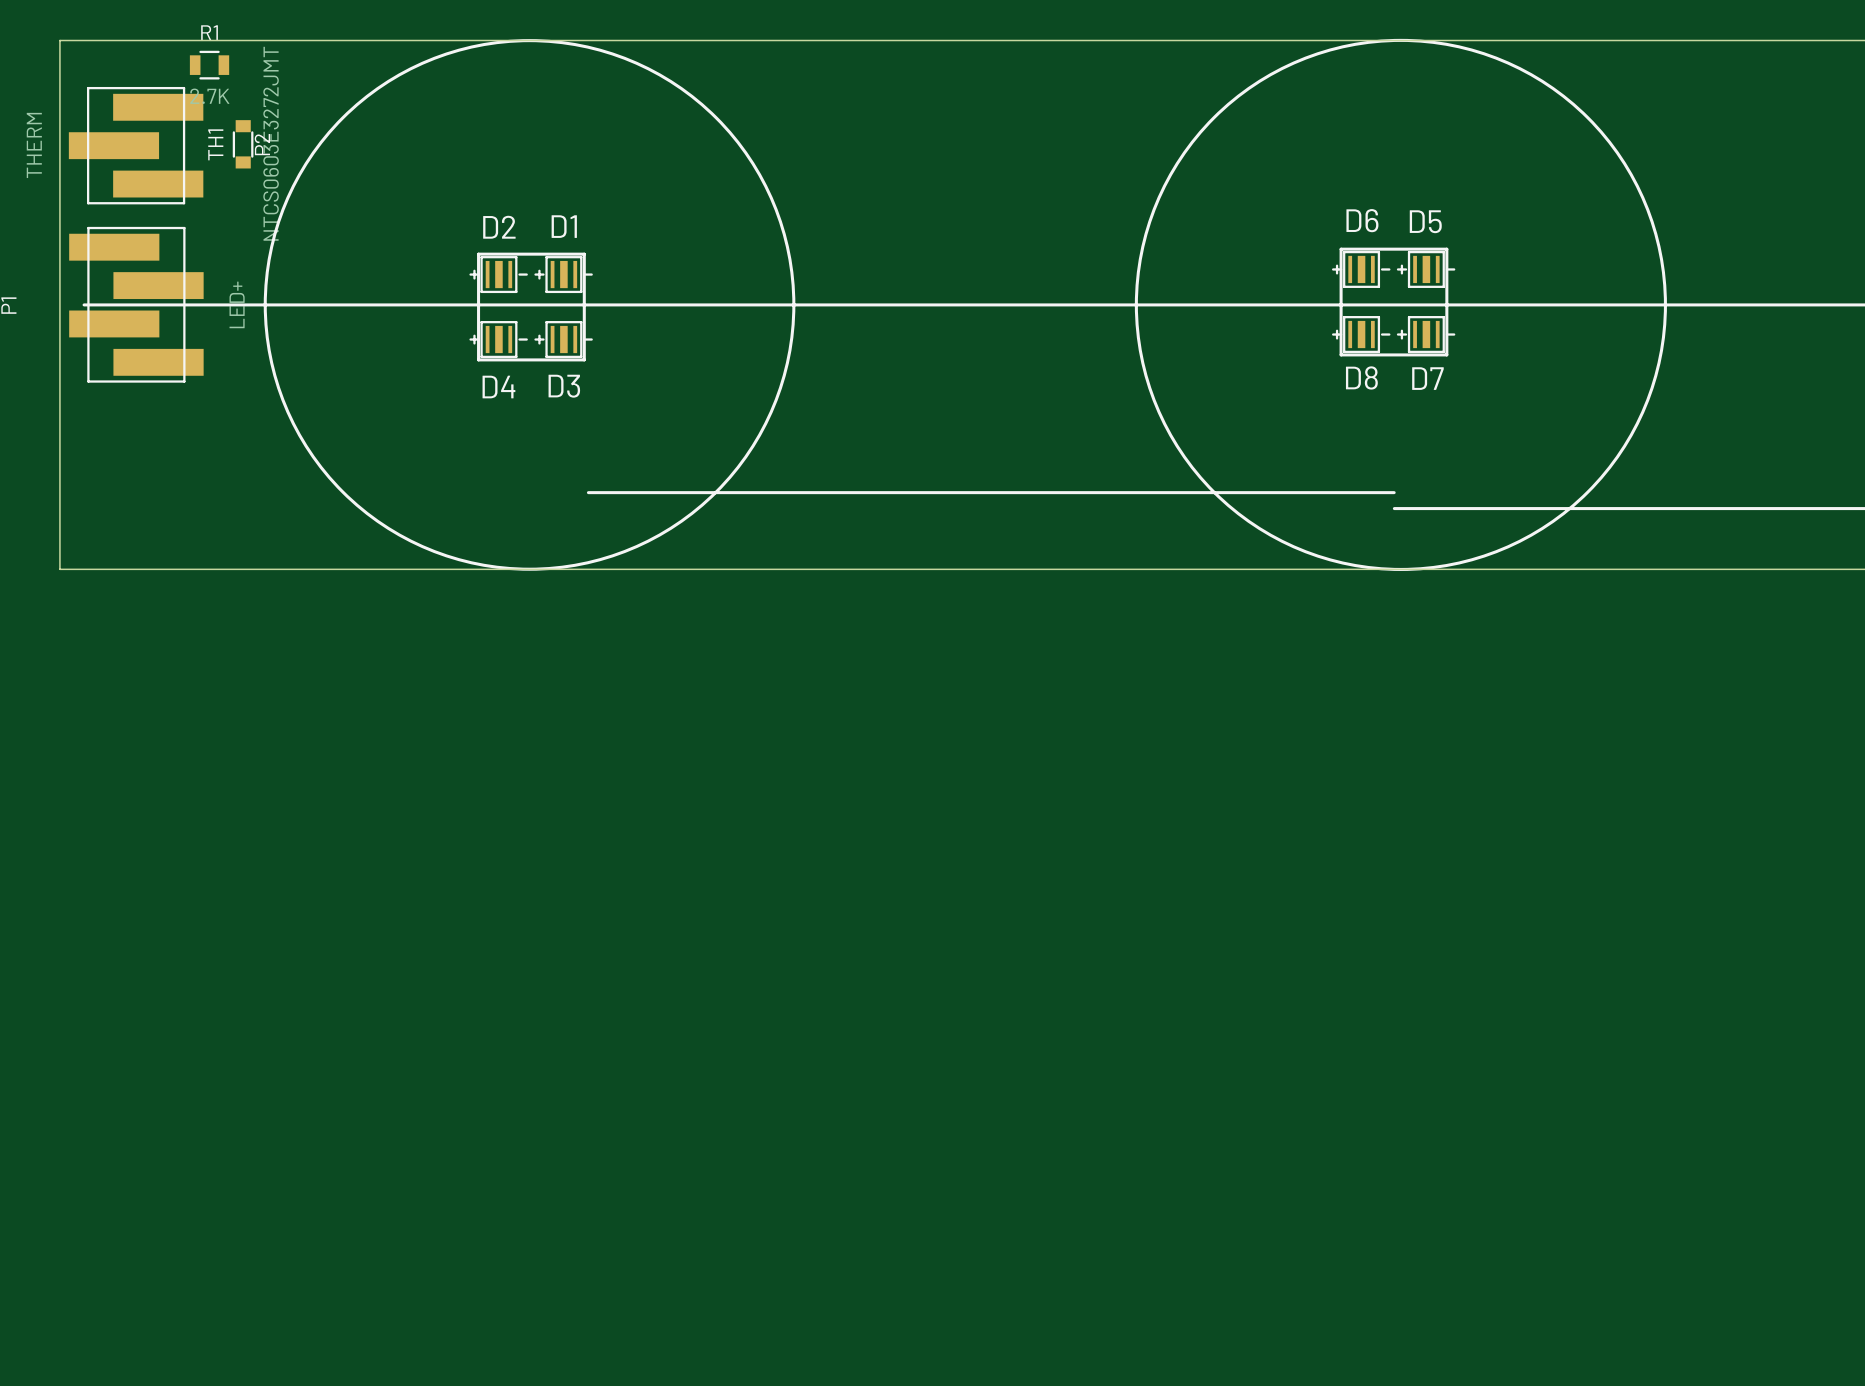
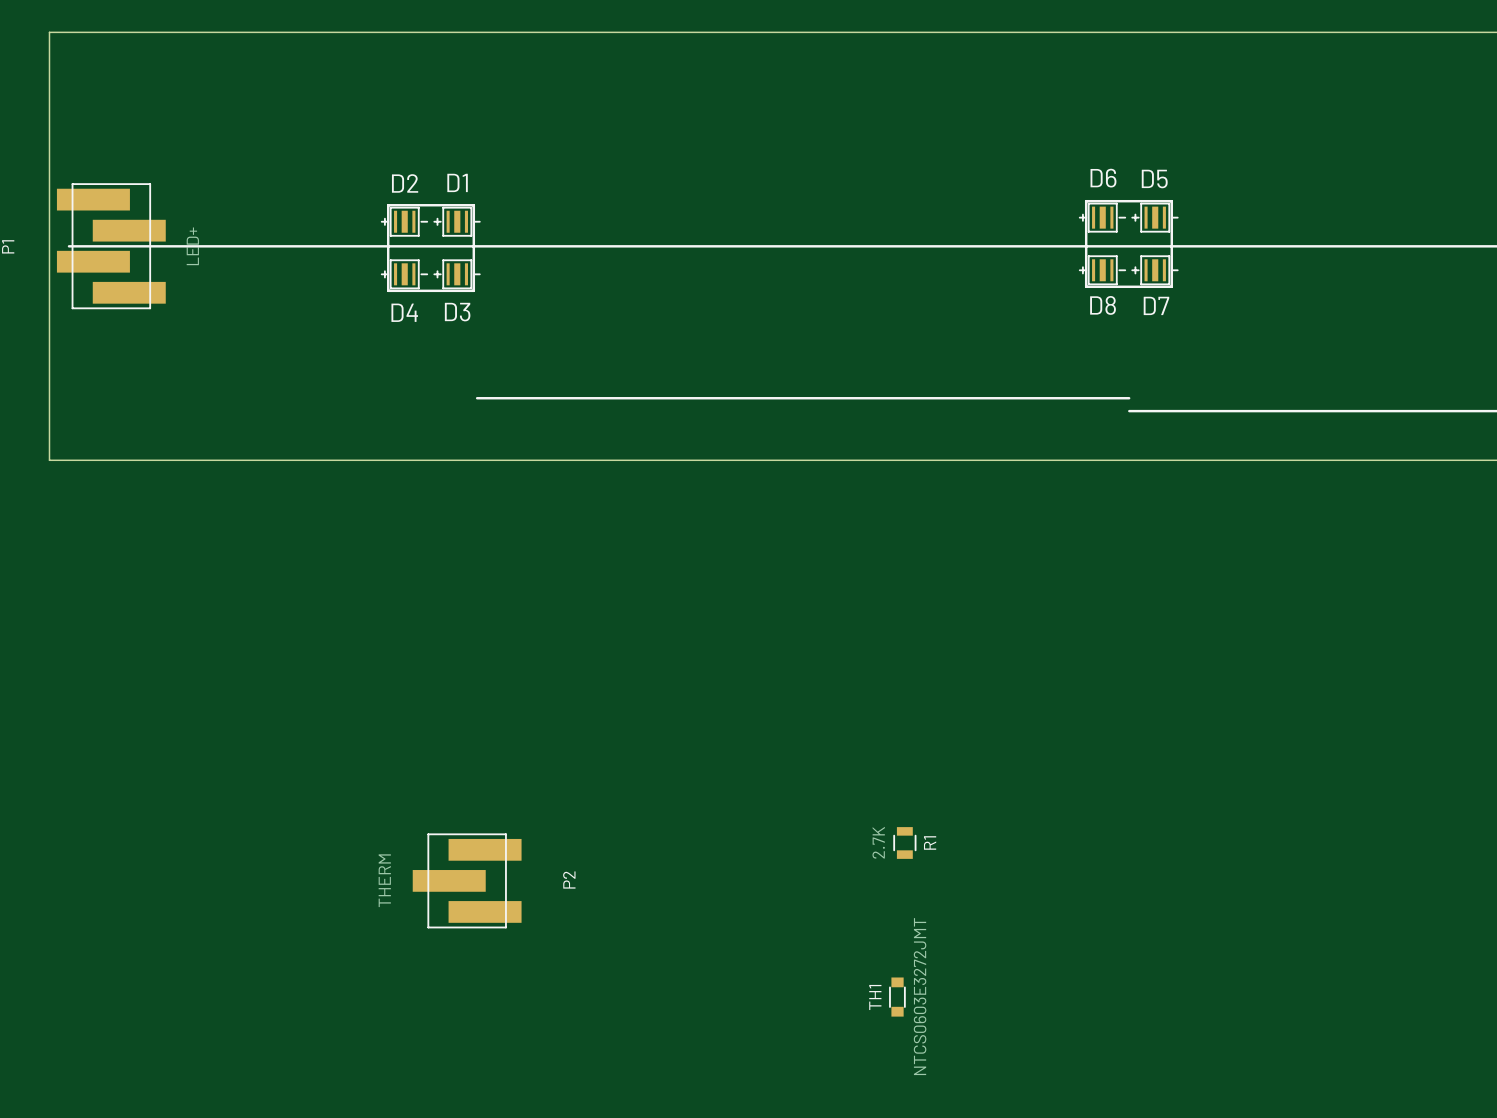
drawing: [1134, 38, 1667, 571] -> none
drawing: [263, 39, 796, 571] -> none
R1 rotation: 0° (209, 65) -> 90° clockwise (904, 842)
R1 position: (209, 65) -> (904, 842)
TH1 position: (243, 144) -> (897, 997)
P2 position: (136, 145) -> (467, 880)

